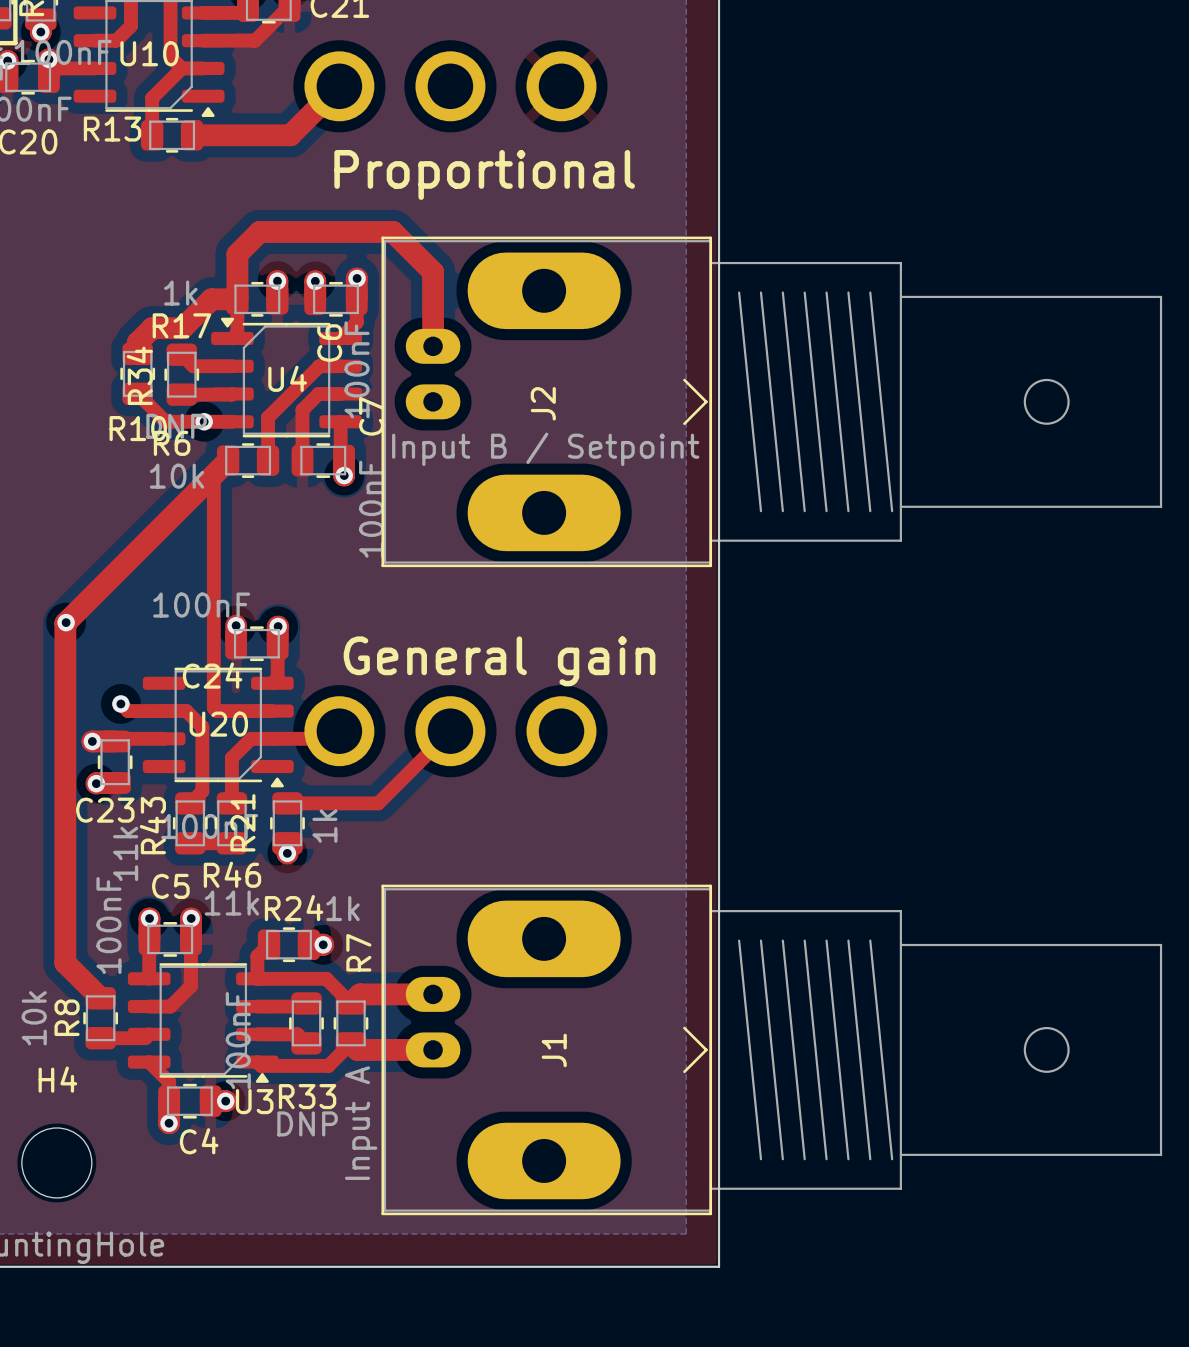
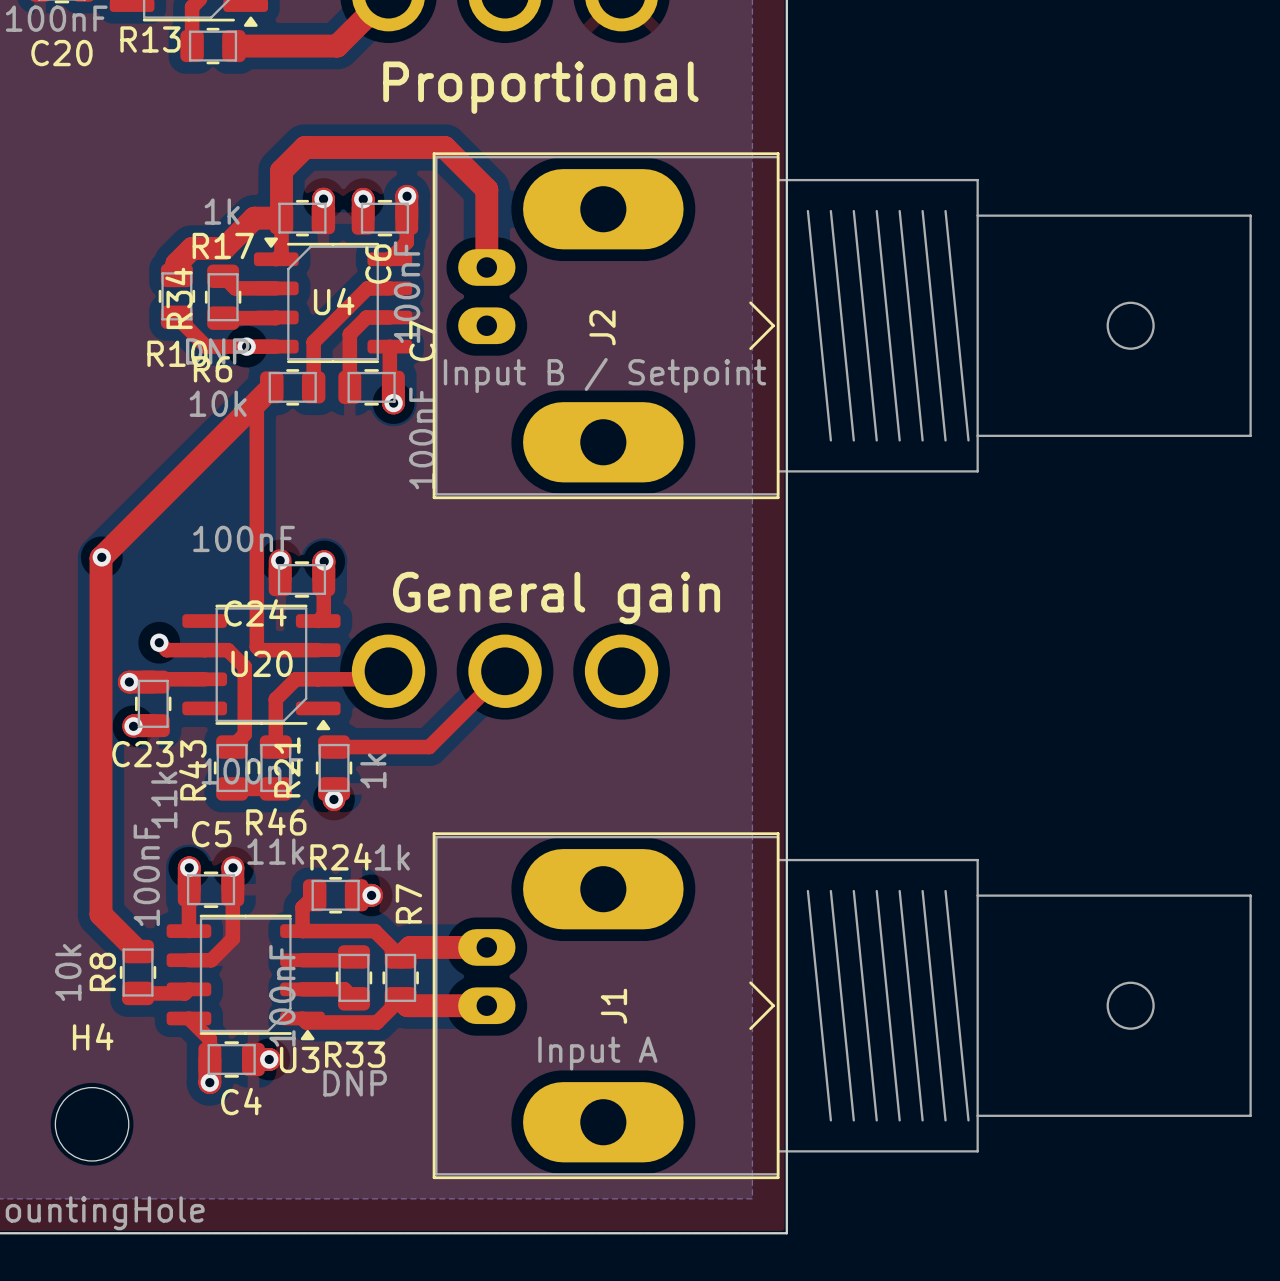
J1 value rotation: 0° (361, 1123) -> 90° clockwise (597, 1053)
J1 value position: Input A (361, 1123) -> Input A (597, 1053)

